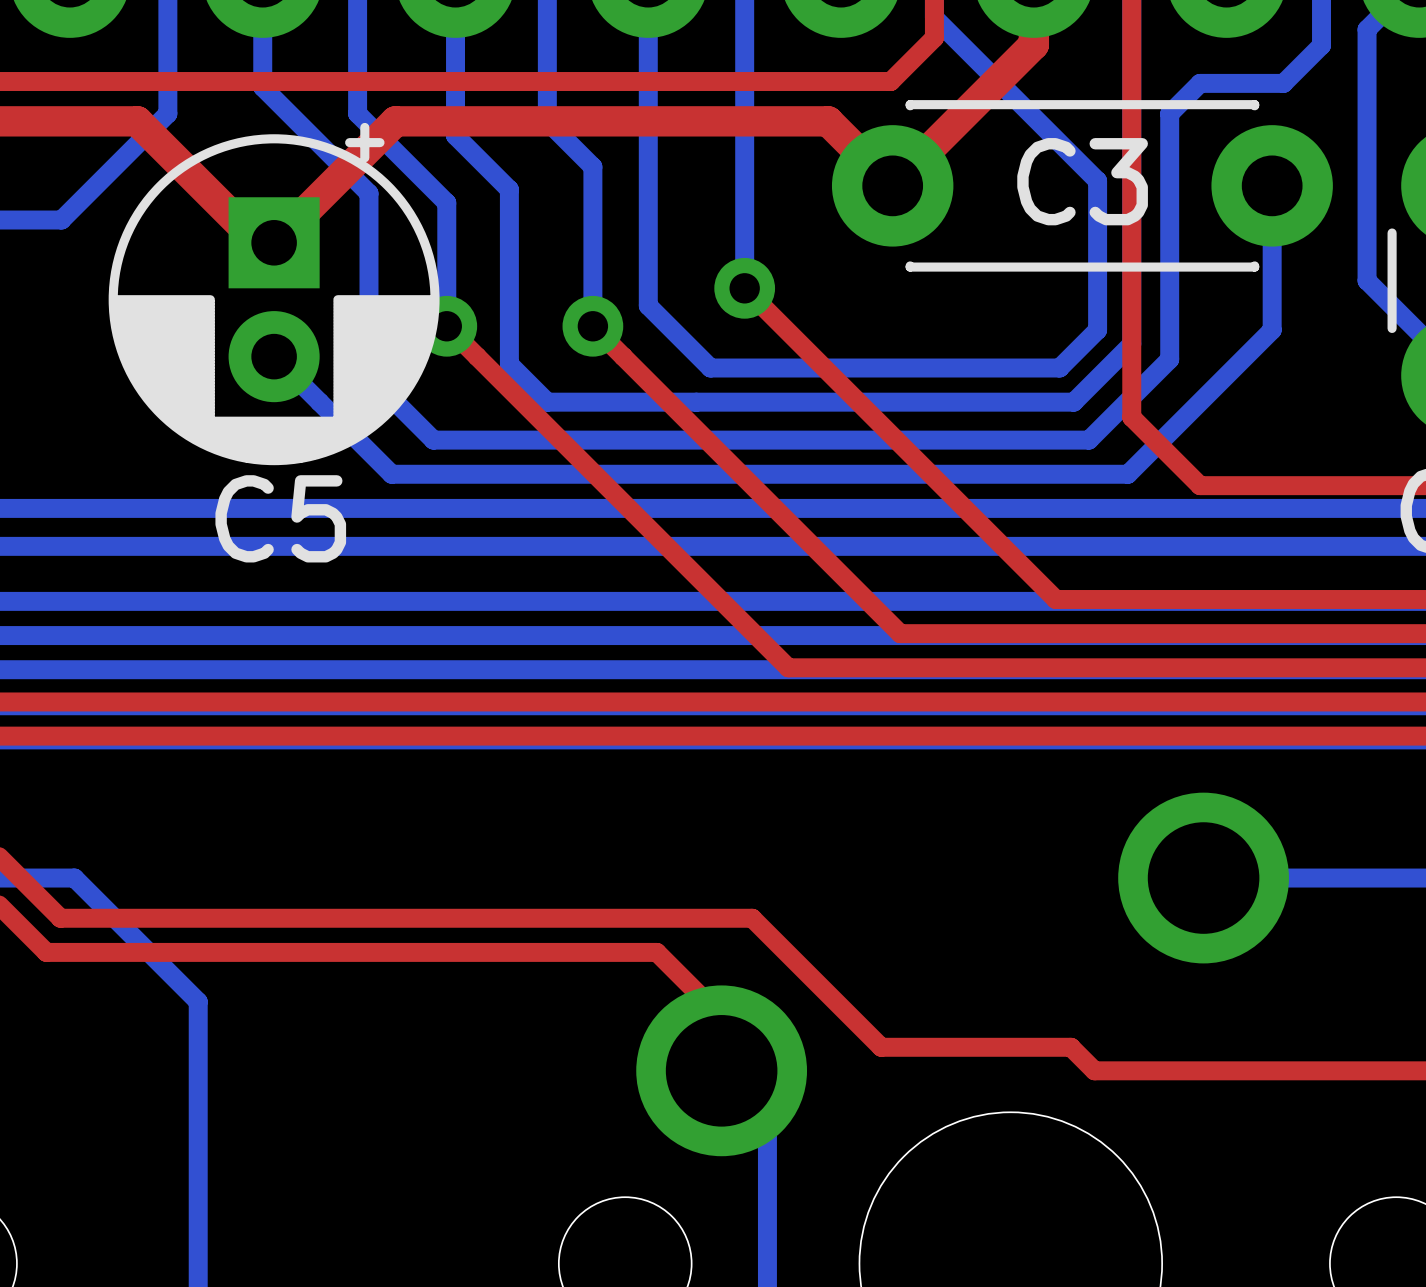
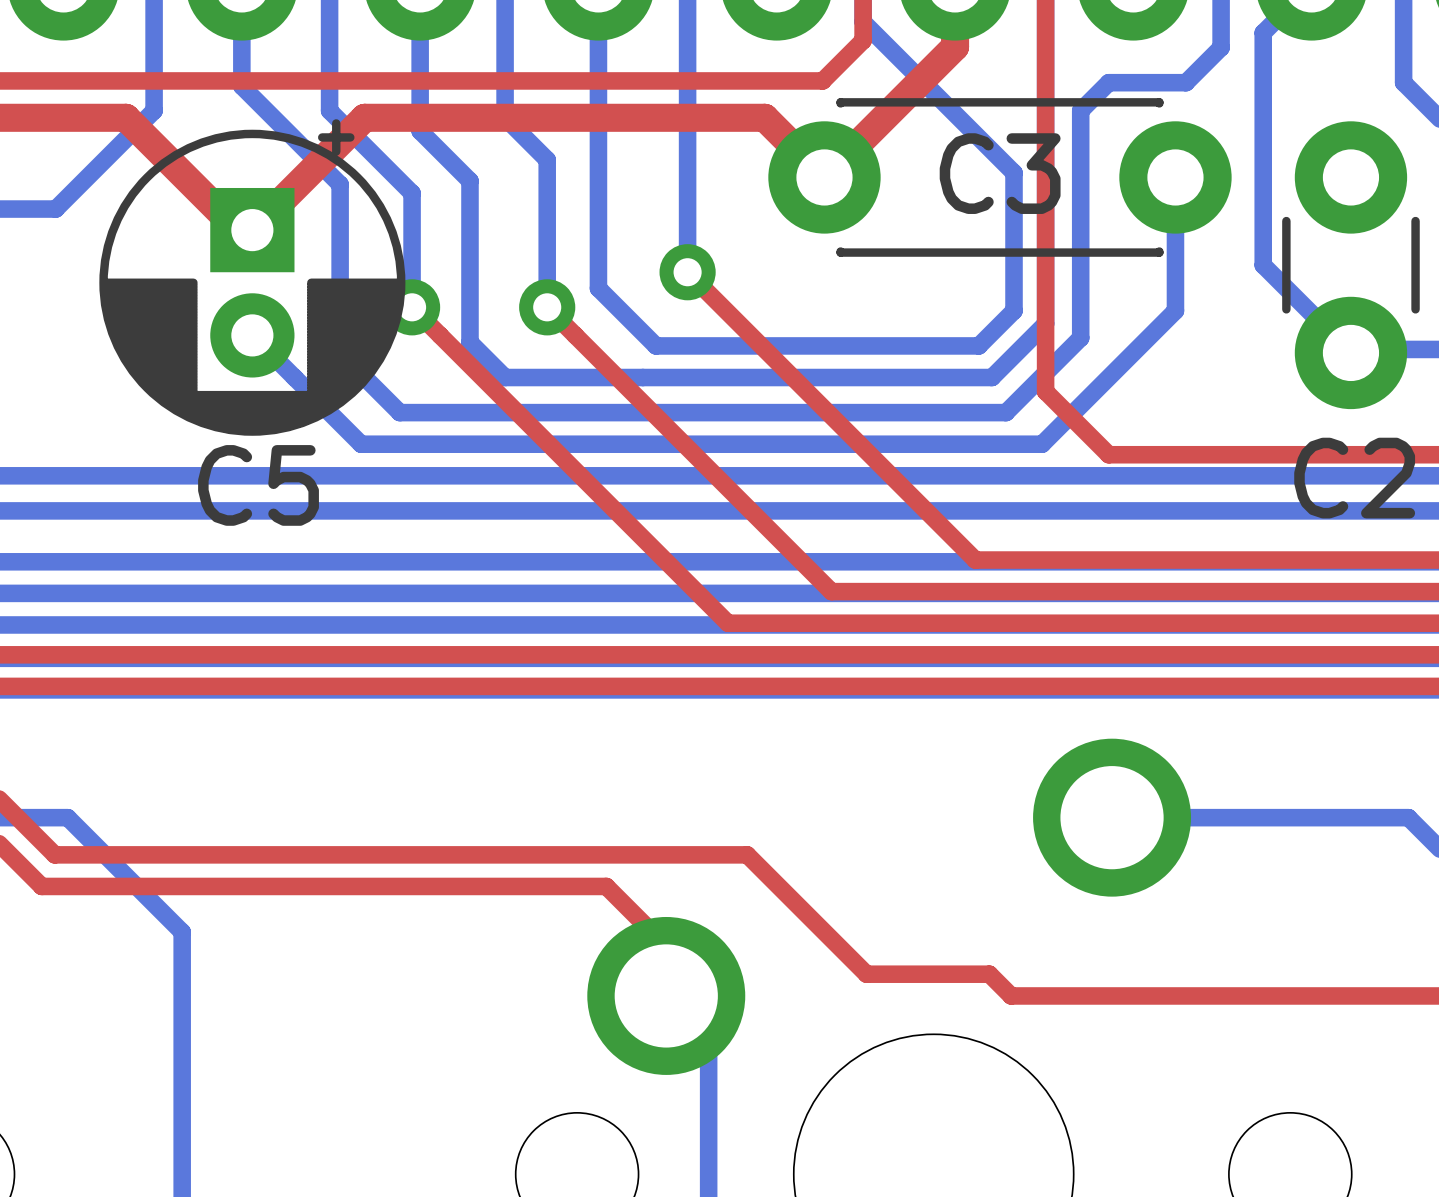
top track: (752, 918) (881, 1047) (938, 1047) -> (694, 854) (747, 854) (866, 974)

